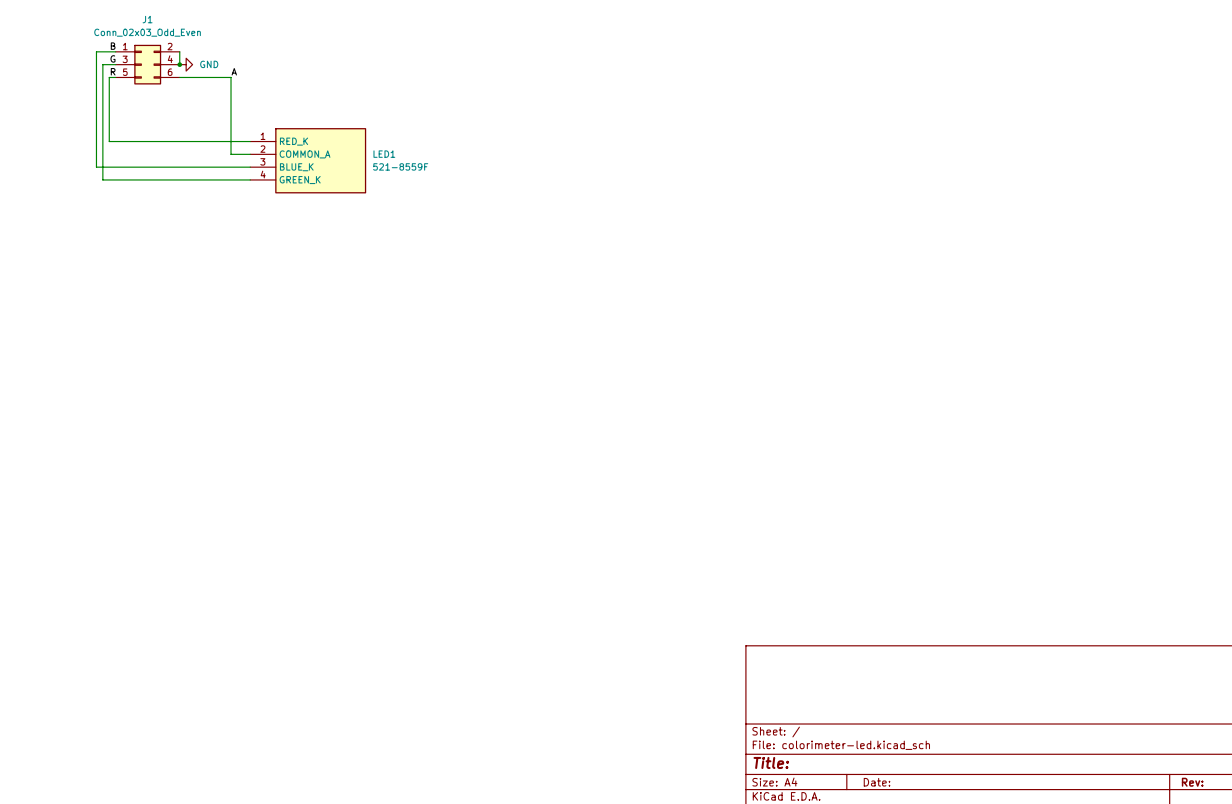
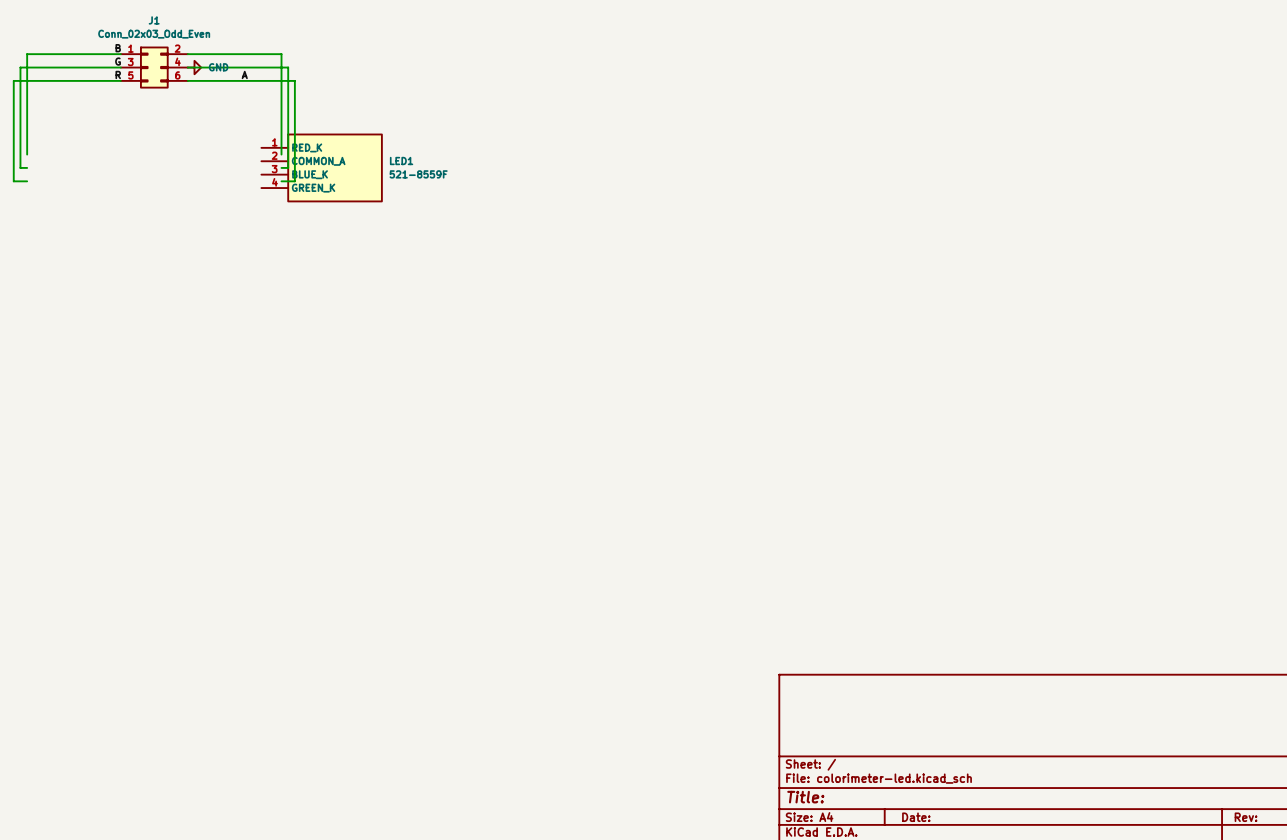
wire: (96, 51) (96, 167) (250, 167) -> (100, 54) (27, 54) (27, 154)
wire: (179, 51) (179, 64) -> (187, 54) (281, 54) (281, 154)
wire: (102, 64) (102, 179) (250, 179) -> (107, 67) (20, 67) (20, 167) (27, 167)
wire: none -> (187, 67) (288, 67) (288, 167) (281, 167)
junction: (179, 64) -> none
wire: (109, 77) (109, 141) (250, 141) -> (114, 80) (13, 80) (13, 181) (27, 181)
wire: (231, 77) (231, 154) (250, 154) -> (241, 80) (294, 80) (294, 181) (281, 181)

